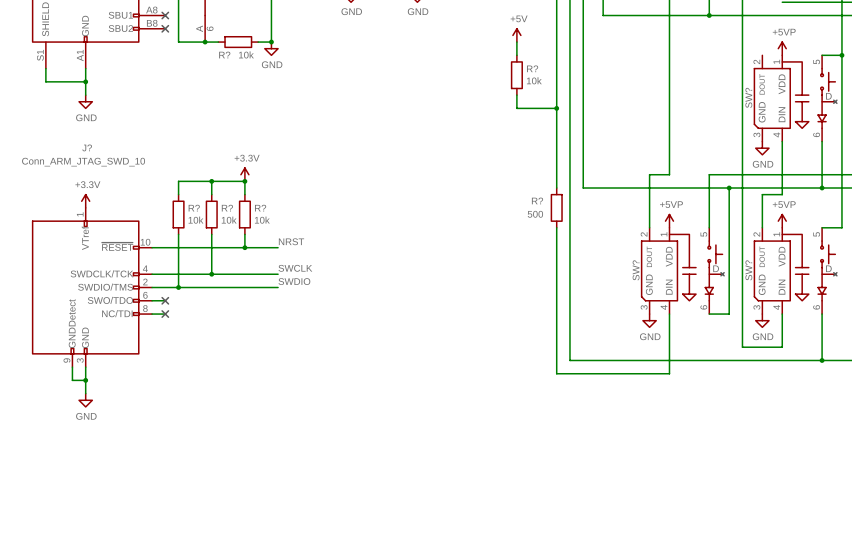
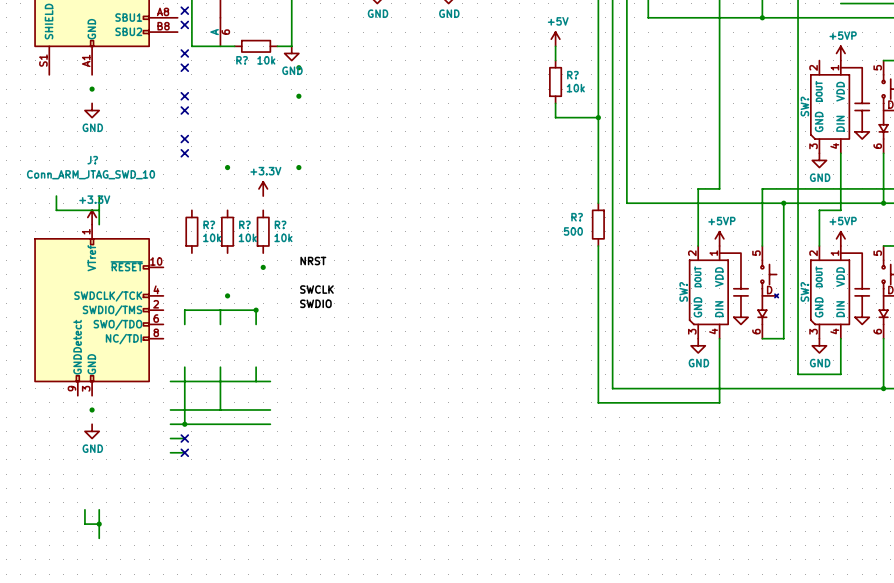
no-connect mark: none -> (184, 10)
no-connect mark: (165, 15) -> none
no-connect mark: none -> (184, 24)
no-connect mark: (165, 28) -> none
junction: (205, 42) -> none
junction position: (271, 42) -> (298, 67)
no-connect mark: none -> (184, 53)
no-connect mark: none -> (184, 67)
wire: (45, 68) (45, 81) (85, 81) -> (56, 196) (56, 210) (99, 210)
wire: (85, 68) (85, 95) -> (99, 196) (99, 224)
no-connect mark: none -> (184, 96)
junction: none -> (298, 96)
no-connect mark: none -> (184, 110)
no-connect mark: none -> (184, 139)
no-connect mark: none -> (184, 153)
junction: none -> (227, 167)
junction: none -> (298, 167)
wire: (211, 181) (211, 194) -> (220, 310) (220, 324)
junction: (211, 181) -> none
junction: (244, 181) -> none
wire: (178, 194) (178, 181) (244, 181) (244, 194) -> none
wire: (178, 234) (178, 287) -> (184, 367) (184, 424)
wire: (211, 234) (211, 274) -> (220, 367) (220, 409)
wire: (244, 234) (244, 247) -> (256, 367) (256, 381)
wire: (152, 247) (278, 247) -> none
wire: (152, 274) (278, 274) -> none
wire: (152, 287) (171, 287) -> (184, 324) (184, 310)
junction: (178, 287) -> none
wire: (238, 287) (278, 287) -> (256, 310) (256, 324)
junction: none -> (256, 310)
wire: (152, 300) (165, 300) -> (170, 438) (184, 438)
no-connect mark: (165, 300) -> none
wire: (152, 314) (165, 314) -> (170, 452) (184, 452)
no-connect mark: (165, 314) -> none
wire: none -> (170, 381) (270, 381)
wire: (72, 367) (72, 380) (85, 380) -> (84, 509) (84, 524) (99, 524)
wire: (85, 367) (85, 393) -> (99, 509) (99, 538)
wire: none -> (170, 409) (270, 409)
wire: none -> (170, 424) (270, 424)
junction: none -> (184, 424)
no-connect mark: none -> (184, 438)
no-connect mark: none -> (184, 452)
junction: none -> (99, 524)

